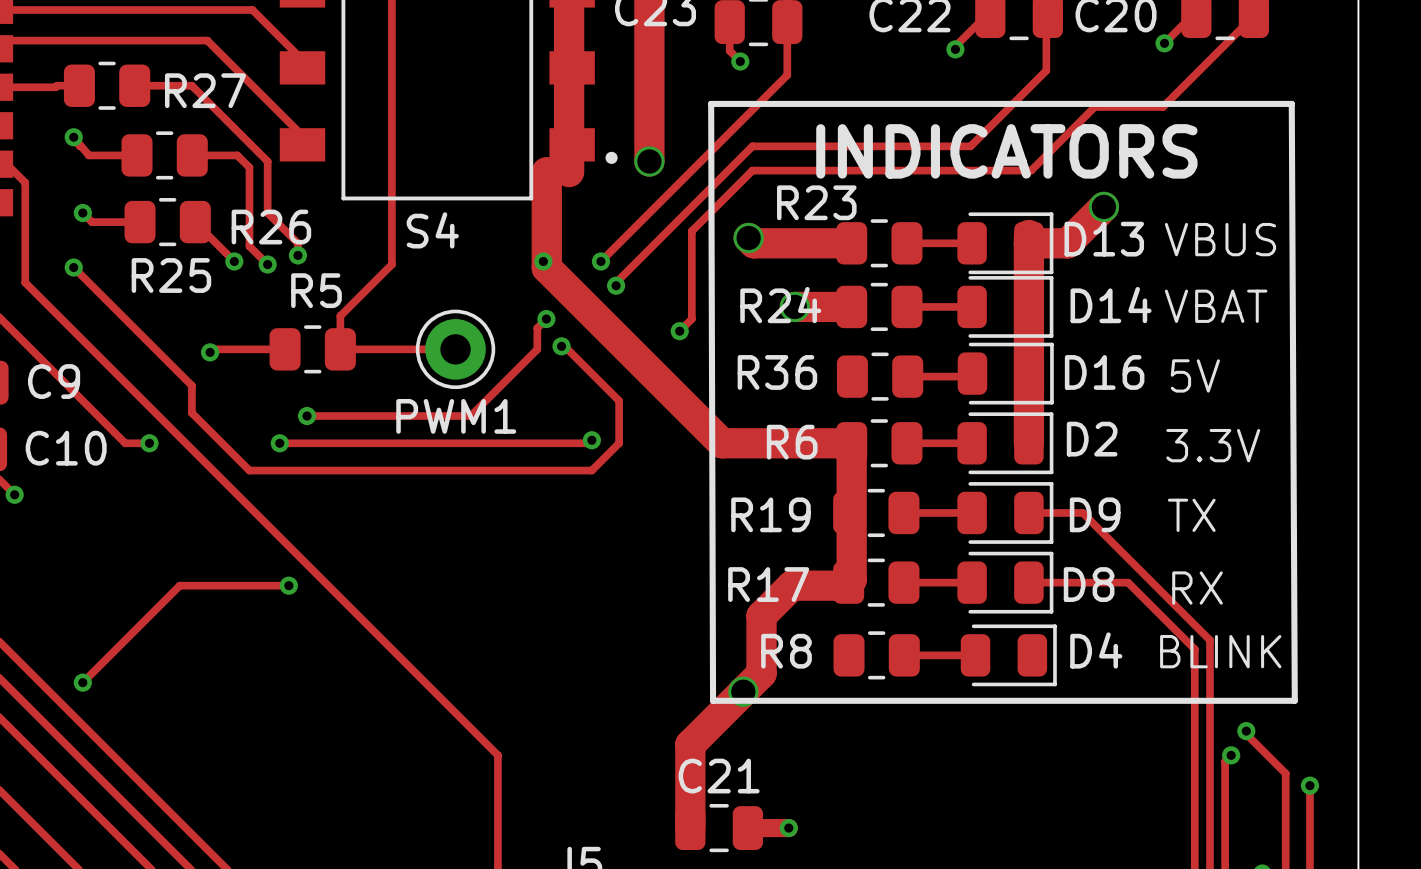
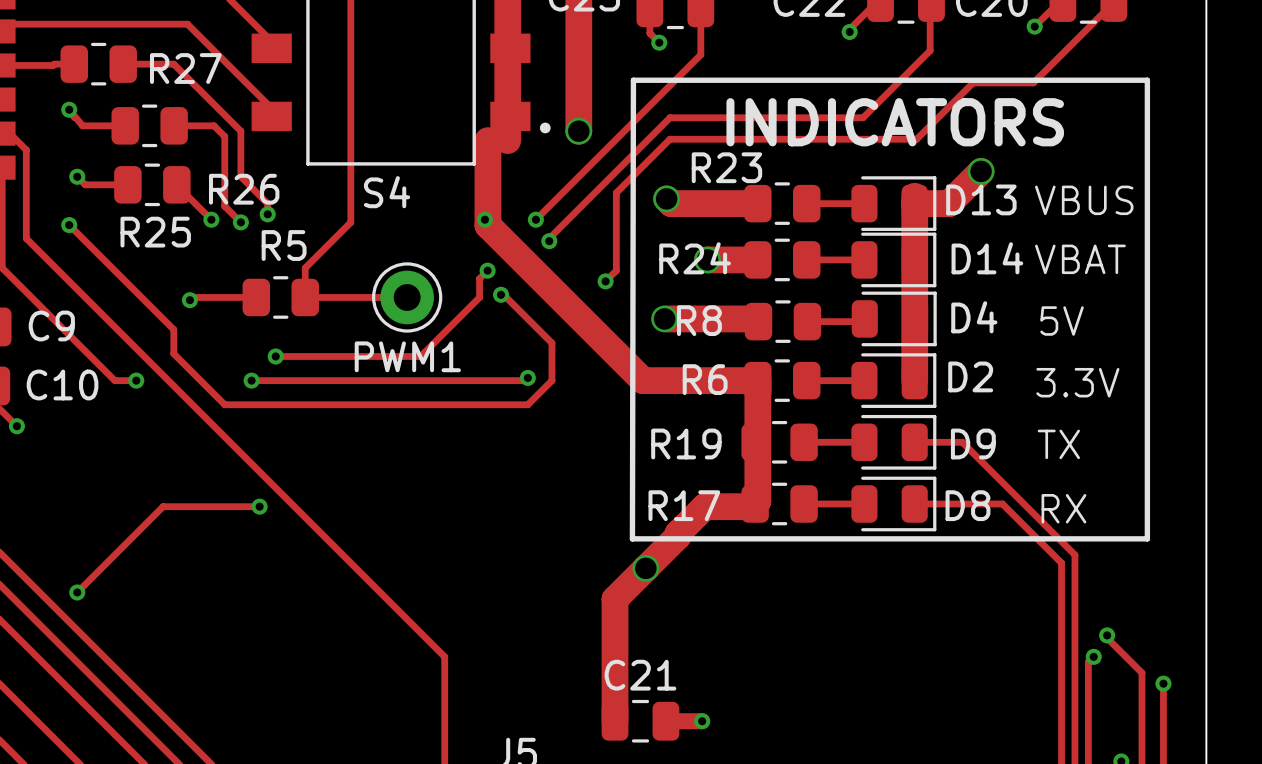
line: (711, 103) (713, 700) (1294, 700) (1291, 103) -> (633, 80) (632, 538) (1147, 538) (1147, 80)
track: none -> (664, 316) (667, 318) (757, 318)
R36 name: R36 (777, 372) -> R8 (699, 320)
D16 name: D16 (1104, 372) -> D4 (974, 317)
via: none -> (664, 318)
track: (761, 619) (761, 673) (690, 744) -> (678, 536) (615, 599) (615, 647)
text: BLINK (1220, 651) -> none
R8: (876, 655) -> none
track: (904, 655) (975, 655) -> none
D4: (1008, 655) -> none
via position: (743, 691) -> (645, 568)

